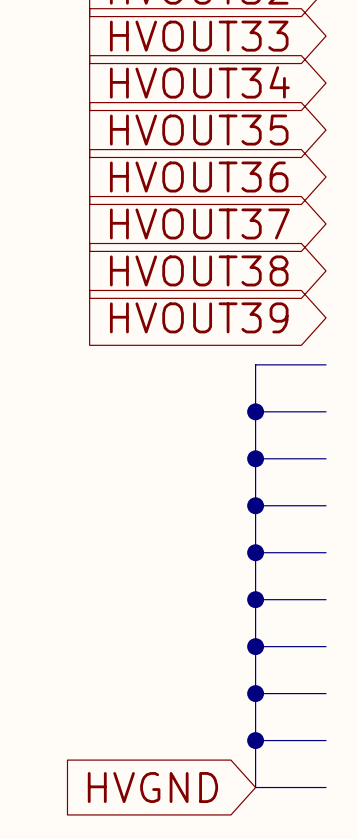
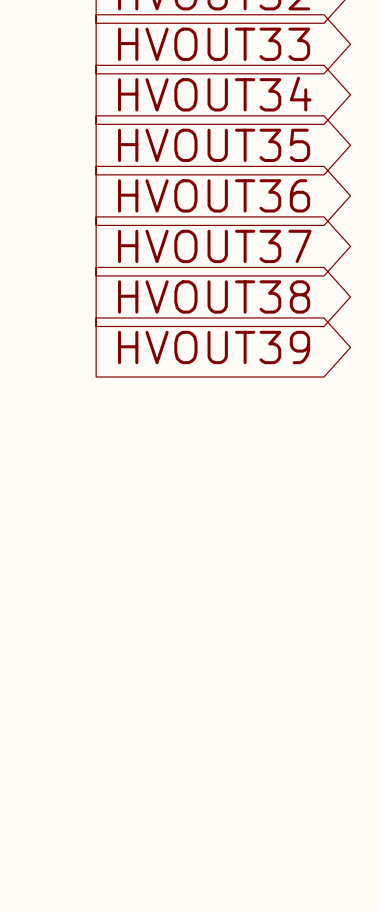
wire: (326, 364) (255, 364) (255, 787) (326, 787) -> none
wire: (255, 411) (326, 411) -> none
junction: (255, 411) -> none
wire: (255, 458) (326, 458) -> none
junction: (255, 458) -> none
wire: (255, 505) (326, 505) -> none
junction: (255, 505) -> none
wire: (255, 552) (326, 552) -> none
junction: (255, 552) -> none
wire: (255, 599) (326, 599) -> none
junction: (255, 599) -> none
wire: (255, 646) (326, 646) -> none
junction: (255, 646) -> none
wire: (255, 693) (326, 693) -> none
junction: (255, 693) -> none
wire: (255, 740) (326, 740) -> none
junction: (255, 740) -> none
global label: HVGND (152, 787) -> none

